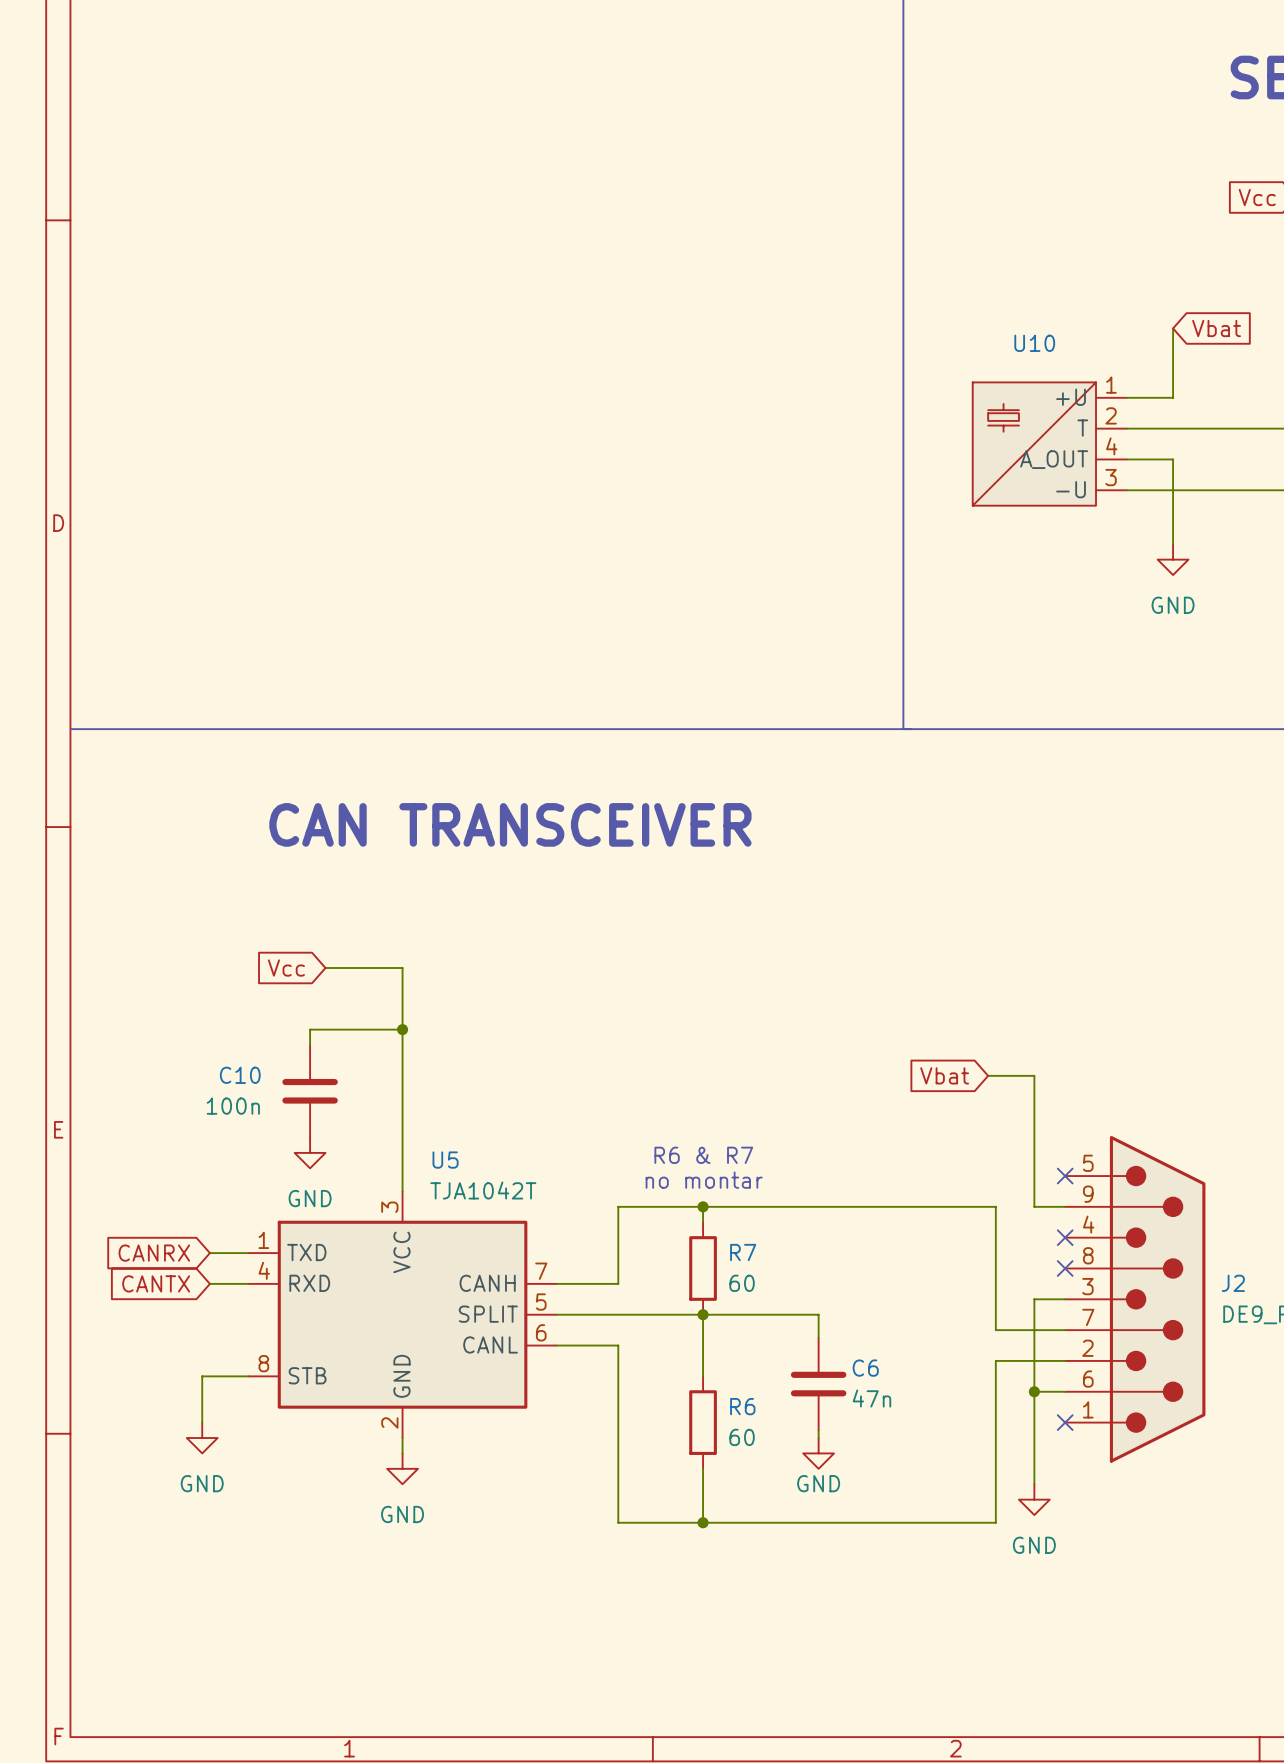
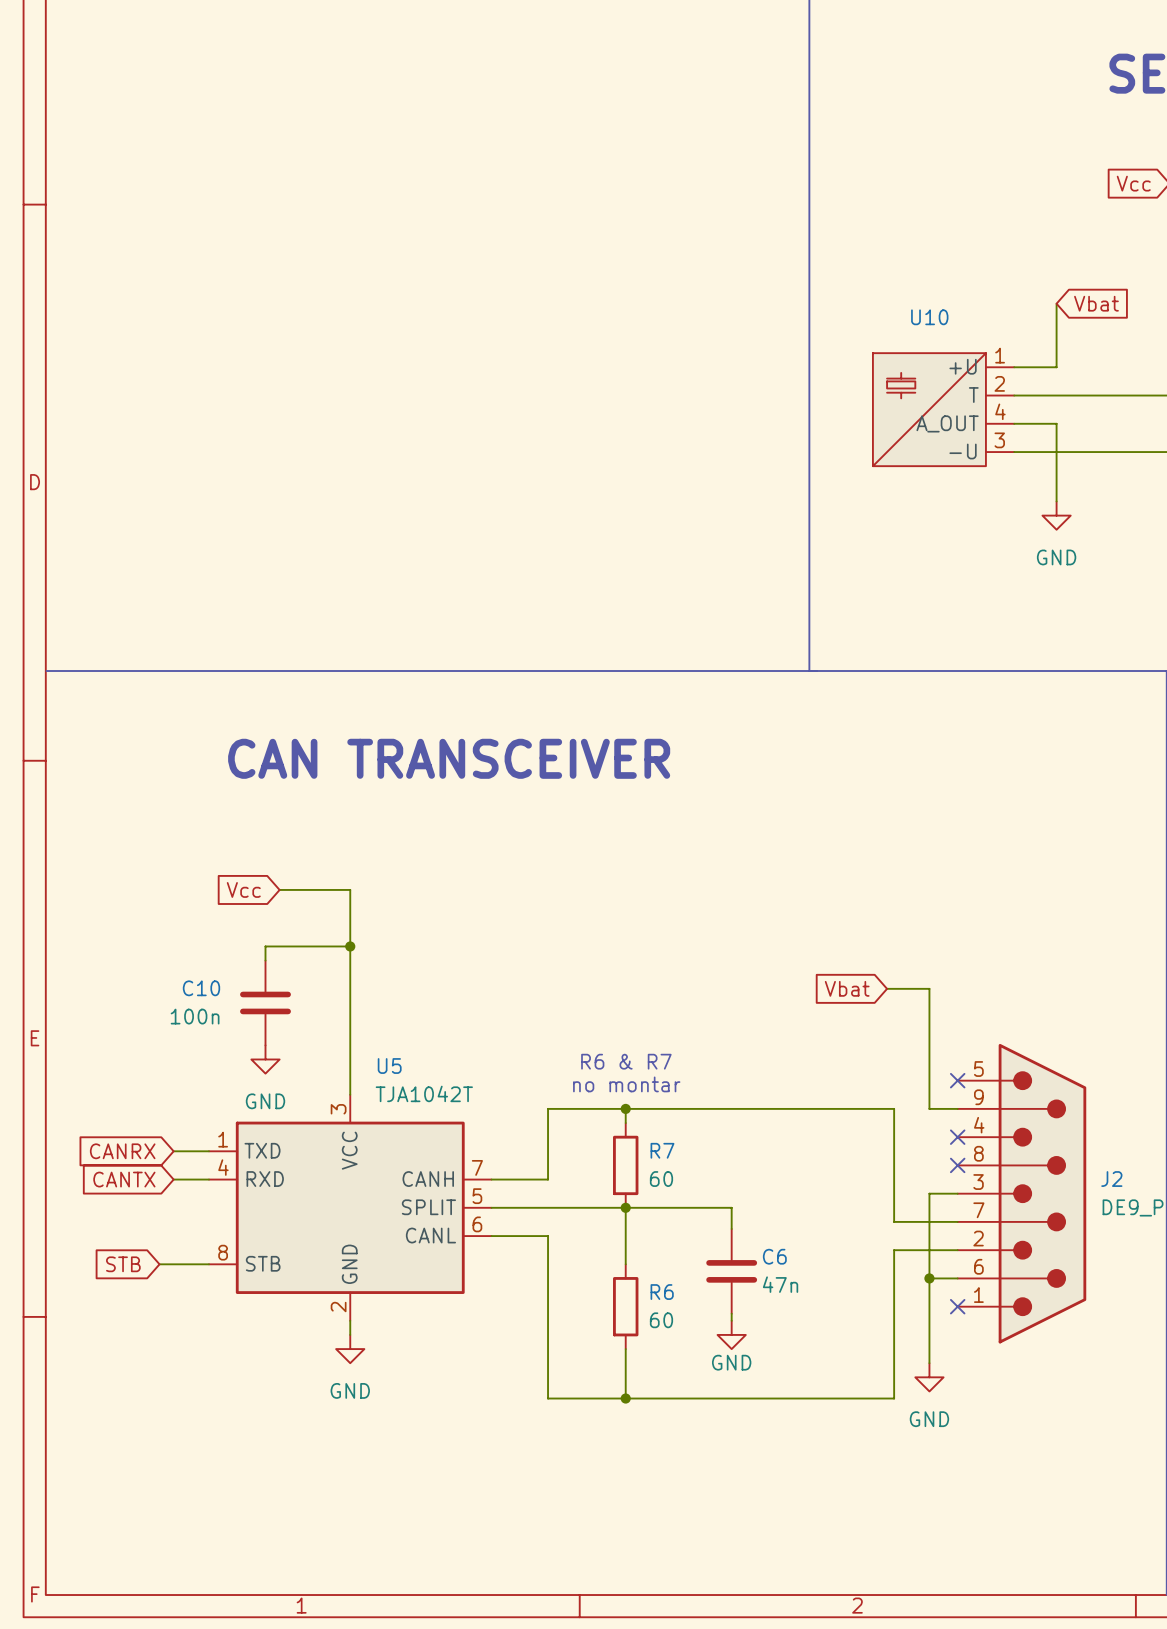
global label: none -> STB (123, 1264)
wire: (202, 1376) (202, 1422) -> (166, 1264) (159, 1264)
power symbol: GND (202, 1438) -> none

